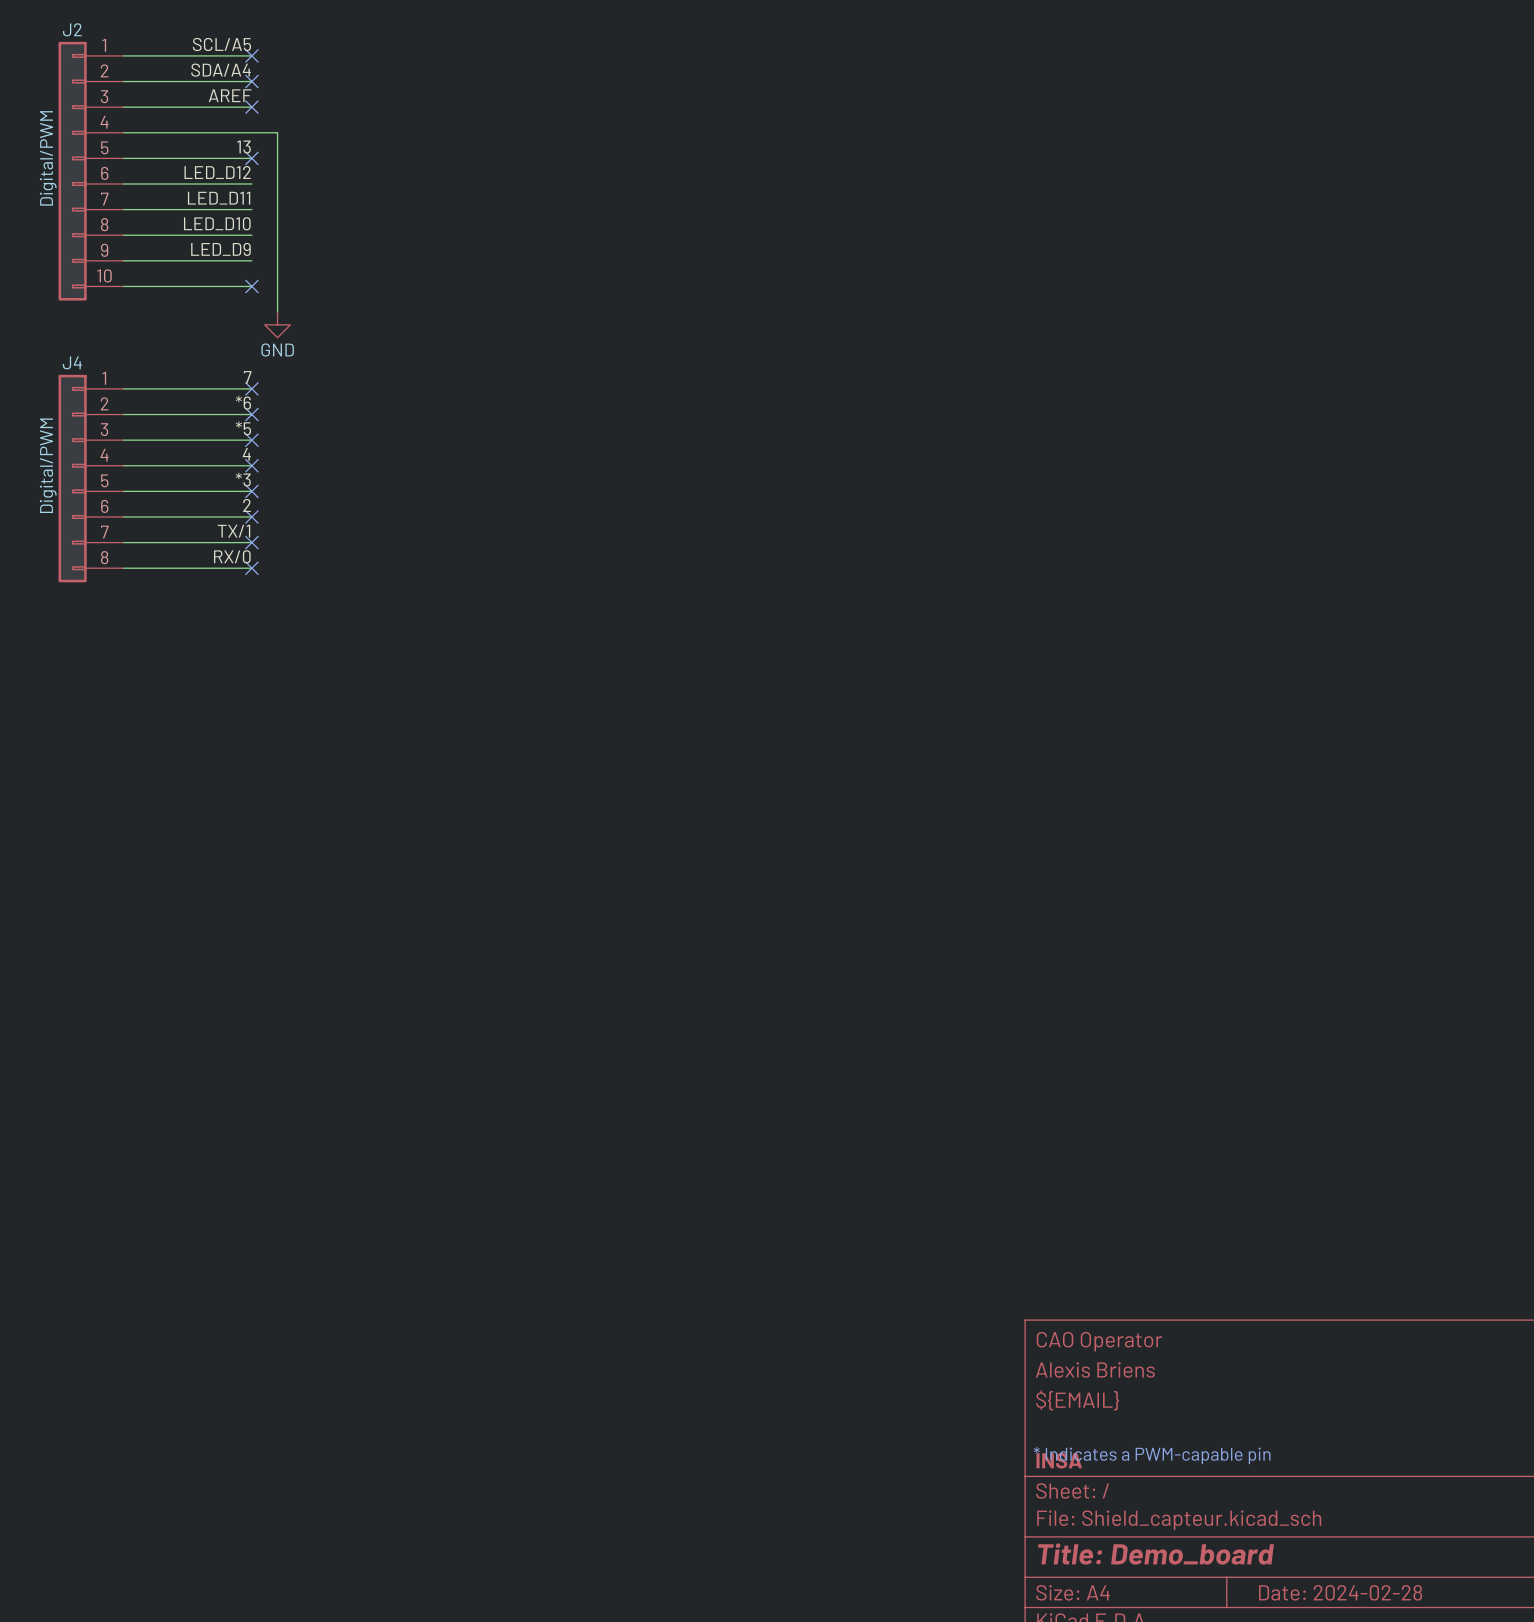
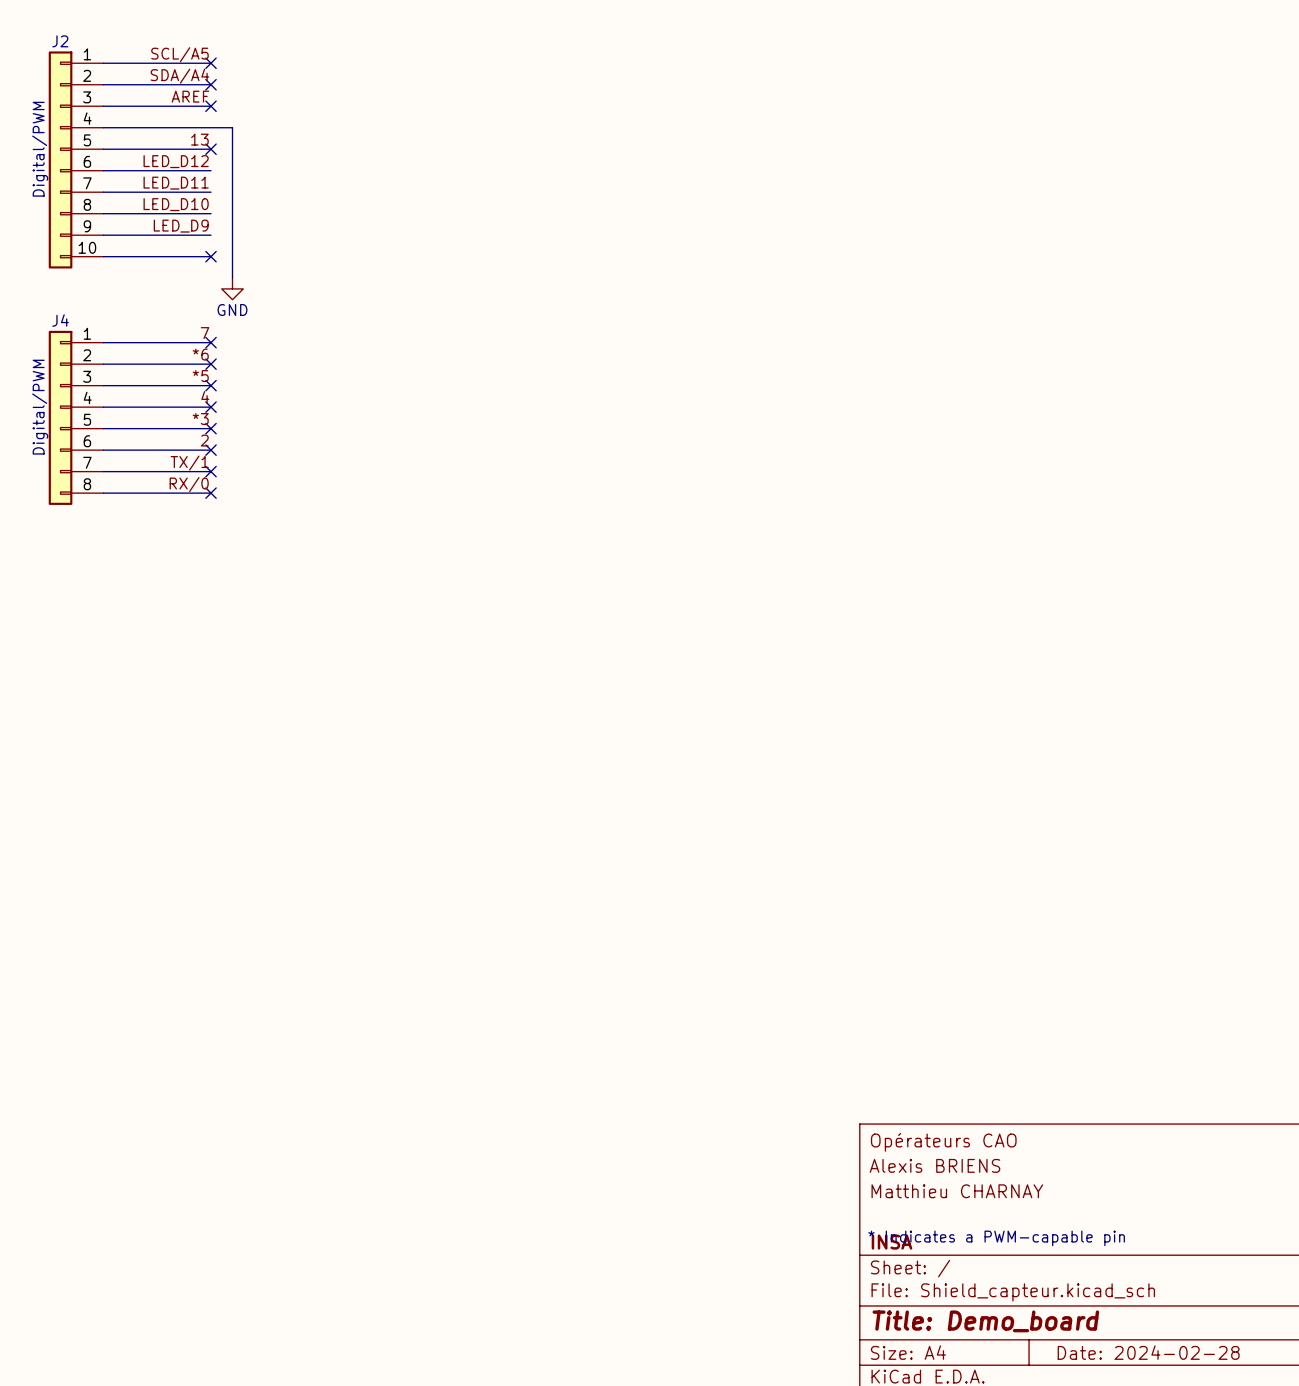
title block: CAO Operator (1099, 1341) -> Opérateurs CAO (943, 1142)
title block: Alexis Briens (1095, 1369) -> Alexis BRIENS (934, 1165)
title block: ${EMAIL} (1077, 1400) -> Matthieu CHARNAY (957, 1191)

